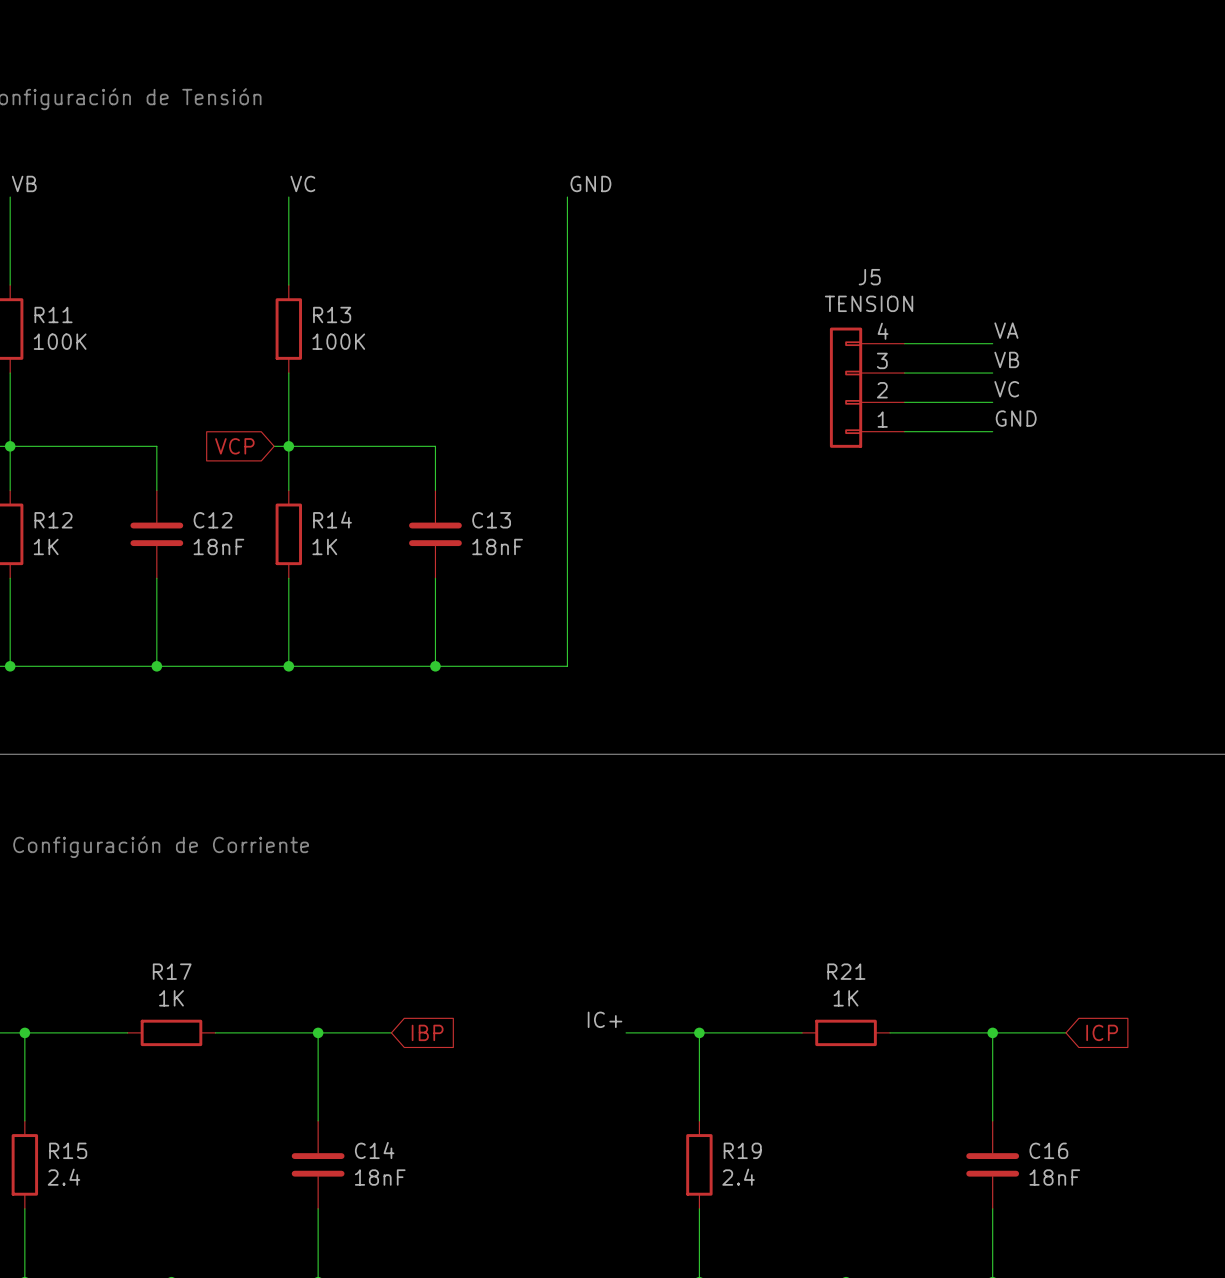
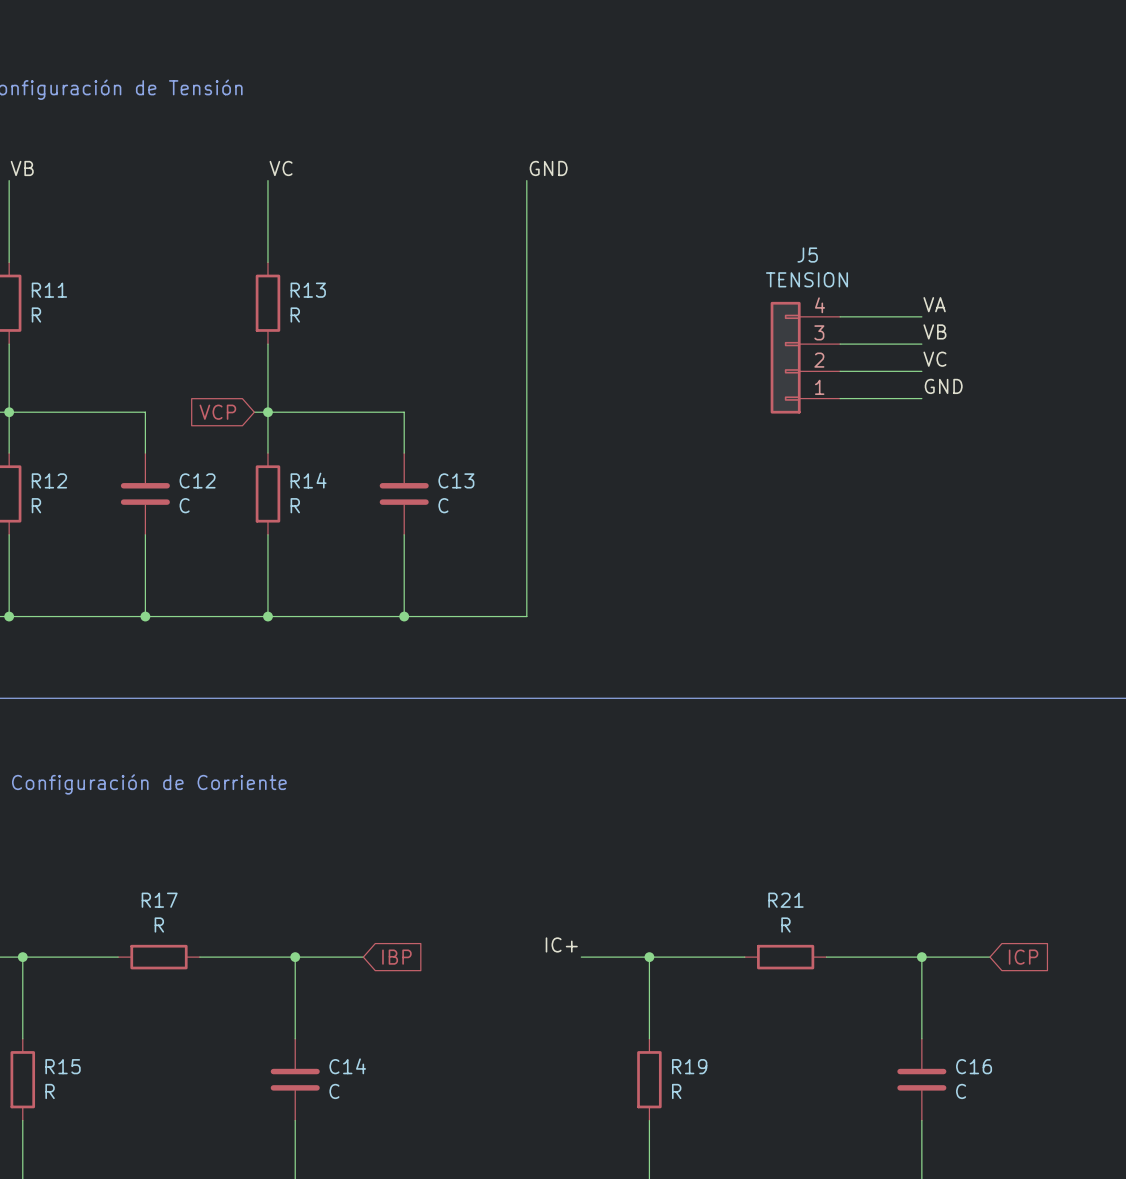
R11 value: 100K (60, 341) -> R (36, 314)
R13 value: 100K (338, 341) -> R (295, 314)
R12 value: 1K (46, 546) -> R (36, 505)
C12 value: 18nF (218, 546) -> C (184, 505)
R14 value: 1K (324, 546) -> R (295, 505)
C13 value: 18nF (497, 546) -> C (443, 505)
R17 value: 1K (171, 998) -> R (159, 924)
R21 value: 1K (846, 998) -> R (785, 924)
R15 value: 2.4 (63, 1177) -> R (50, 1091)
C14 value: 18nF (380, 1177) -> C (334, 1091)
R19 value: 2.4 (738, 1177) -> R (676, 1091)
C16 value: 18nF (1054, 1177) -> C (961, 1091)

